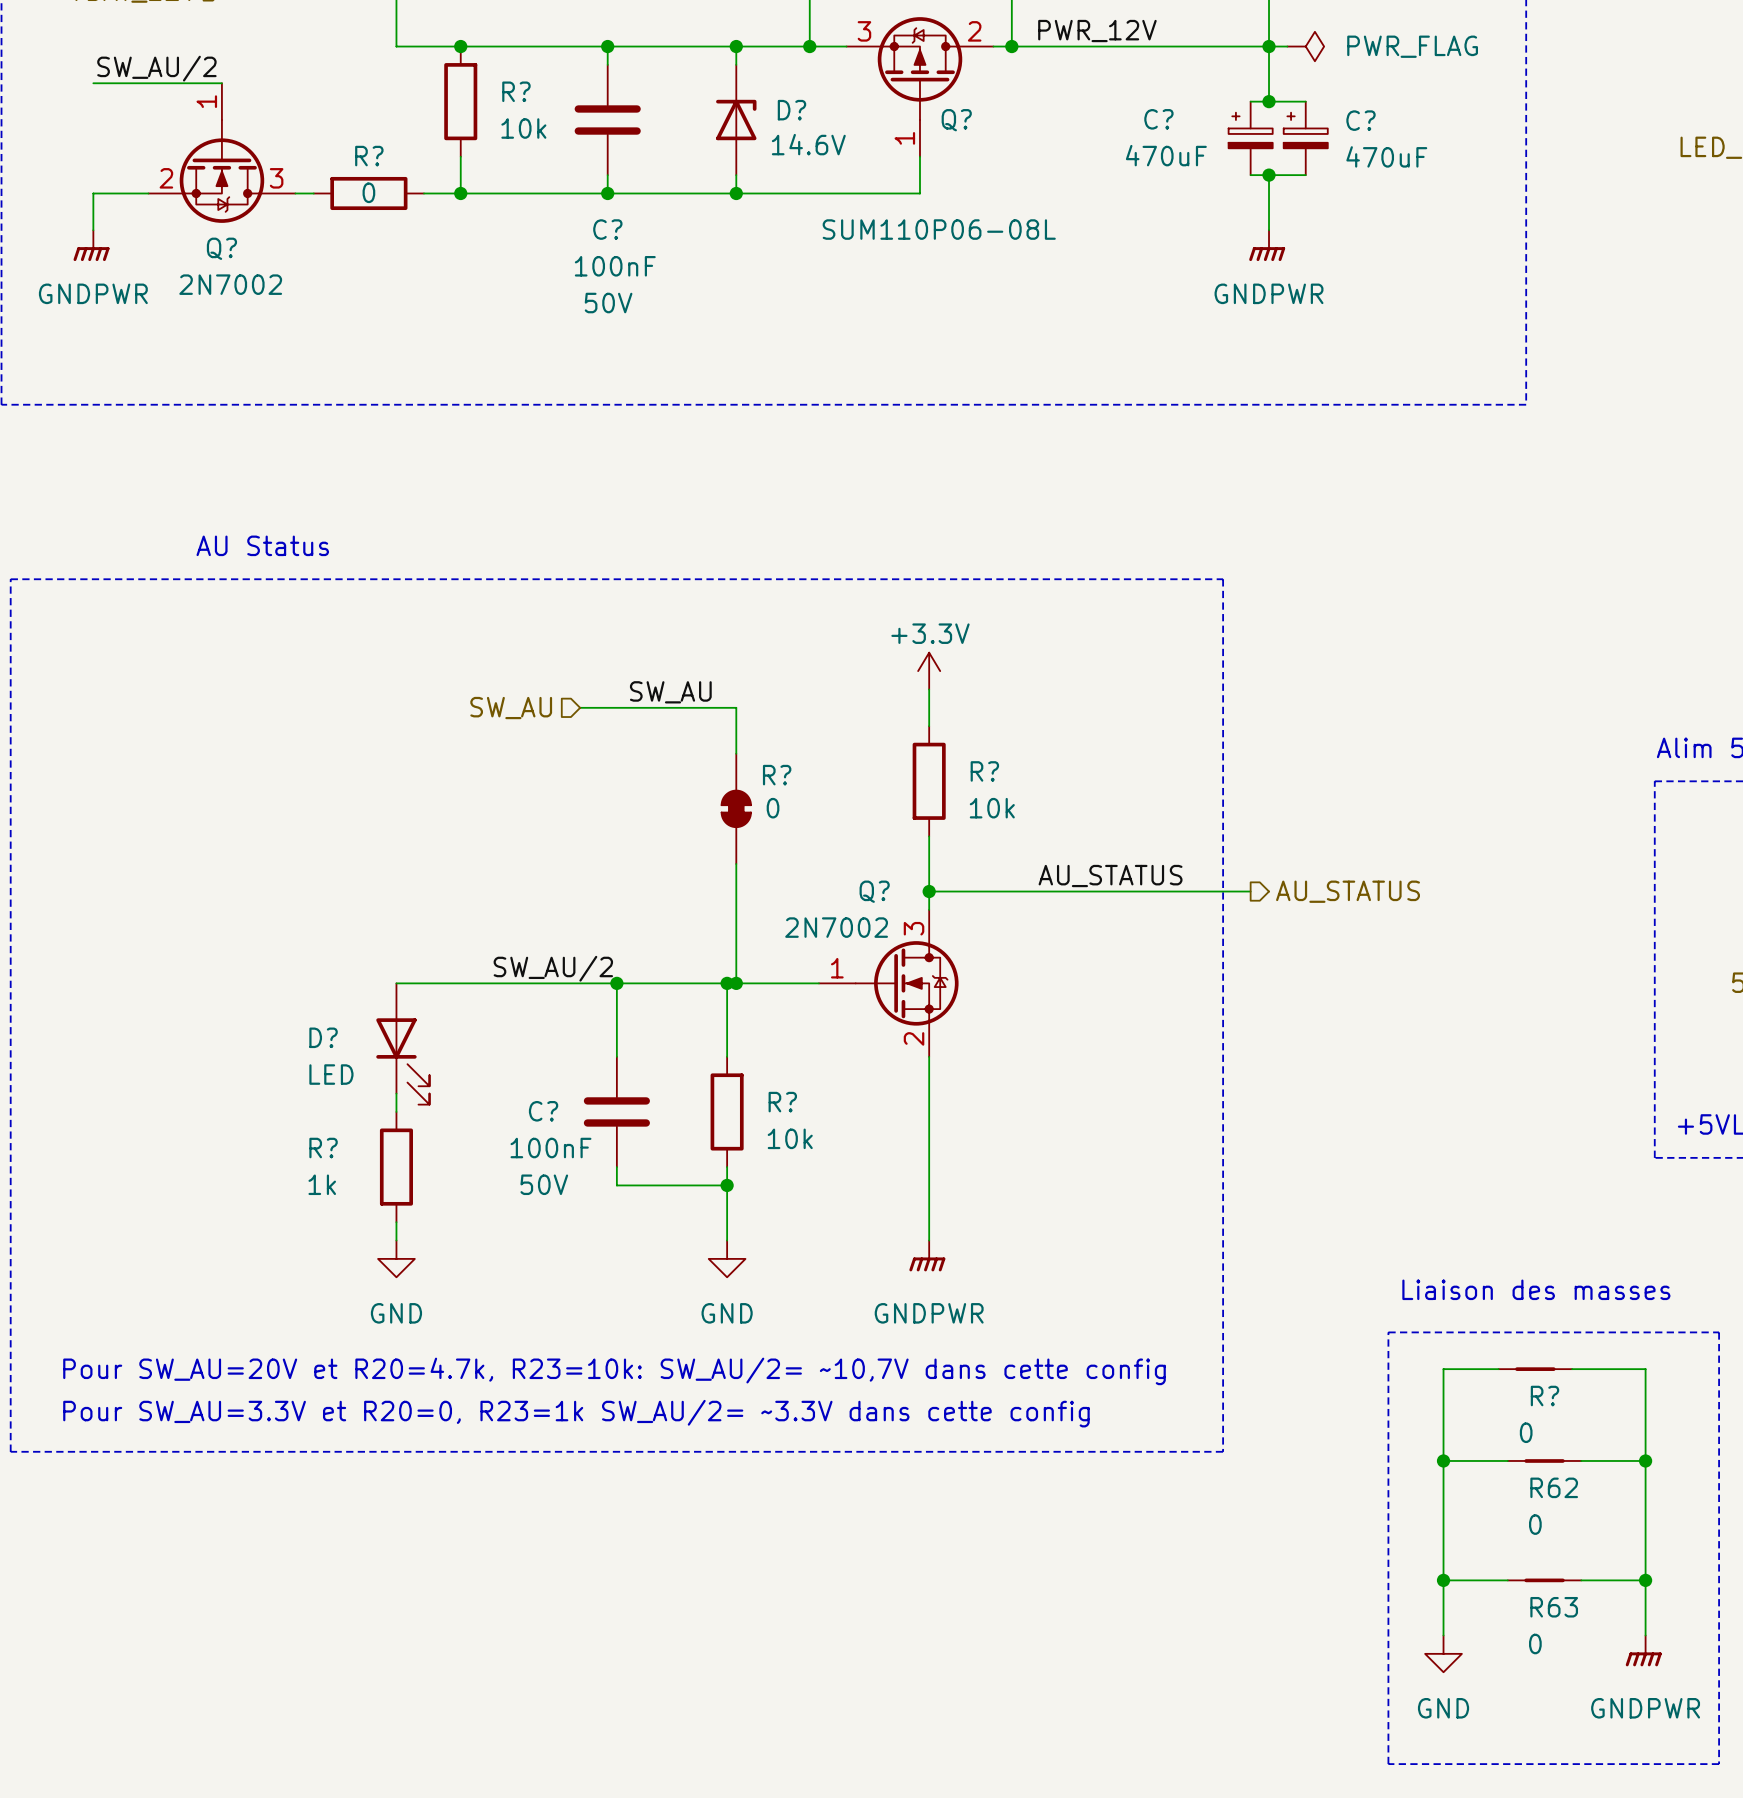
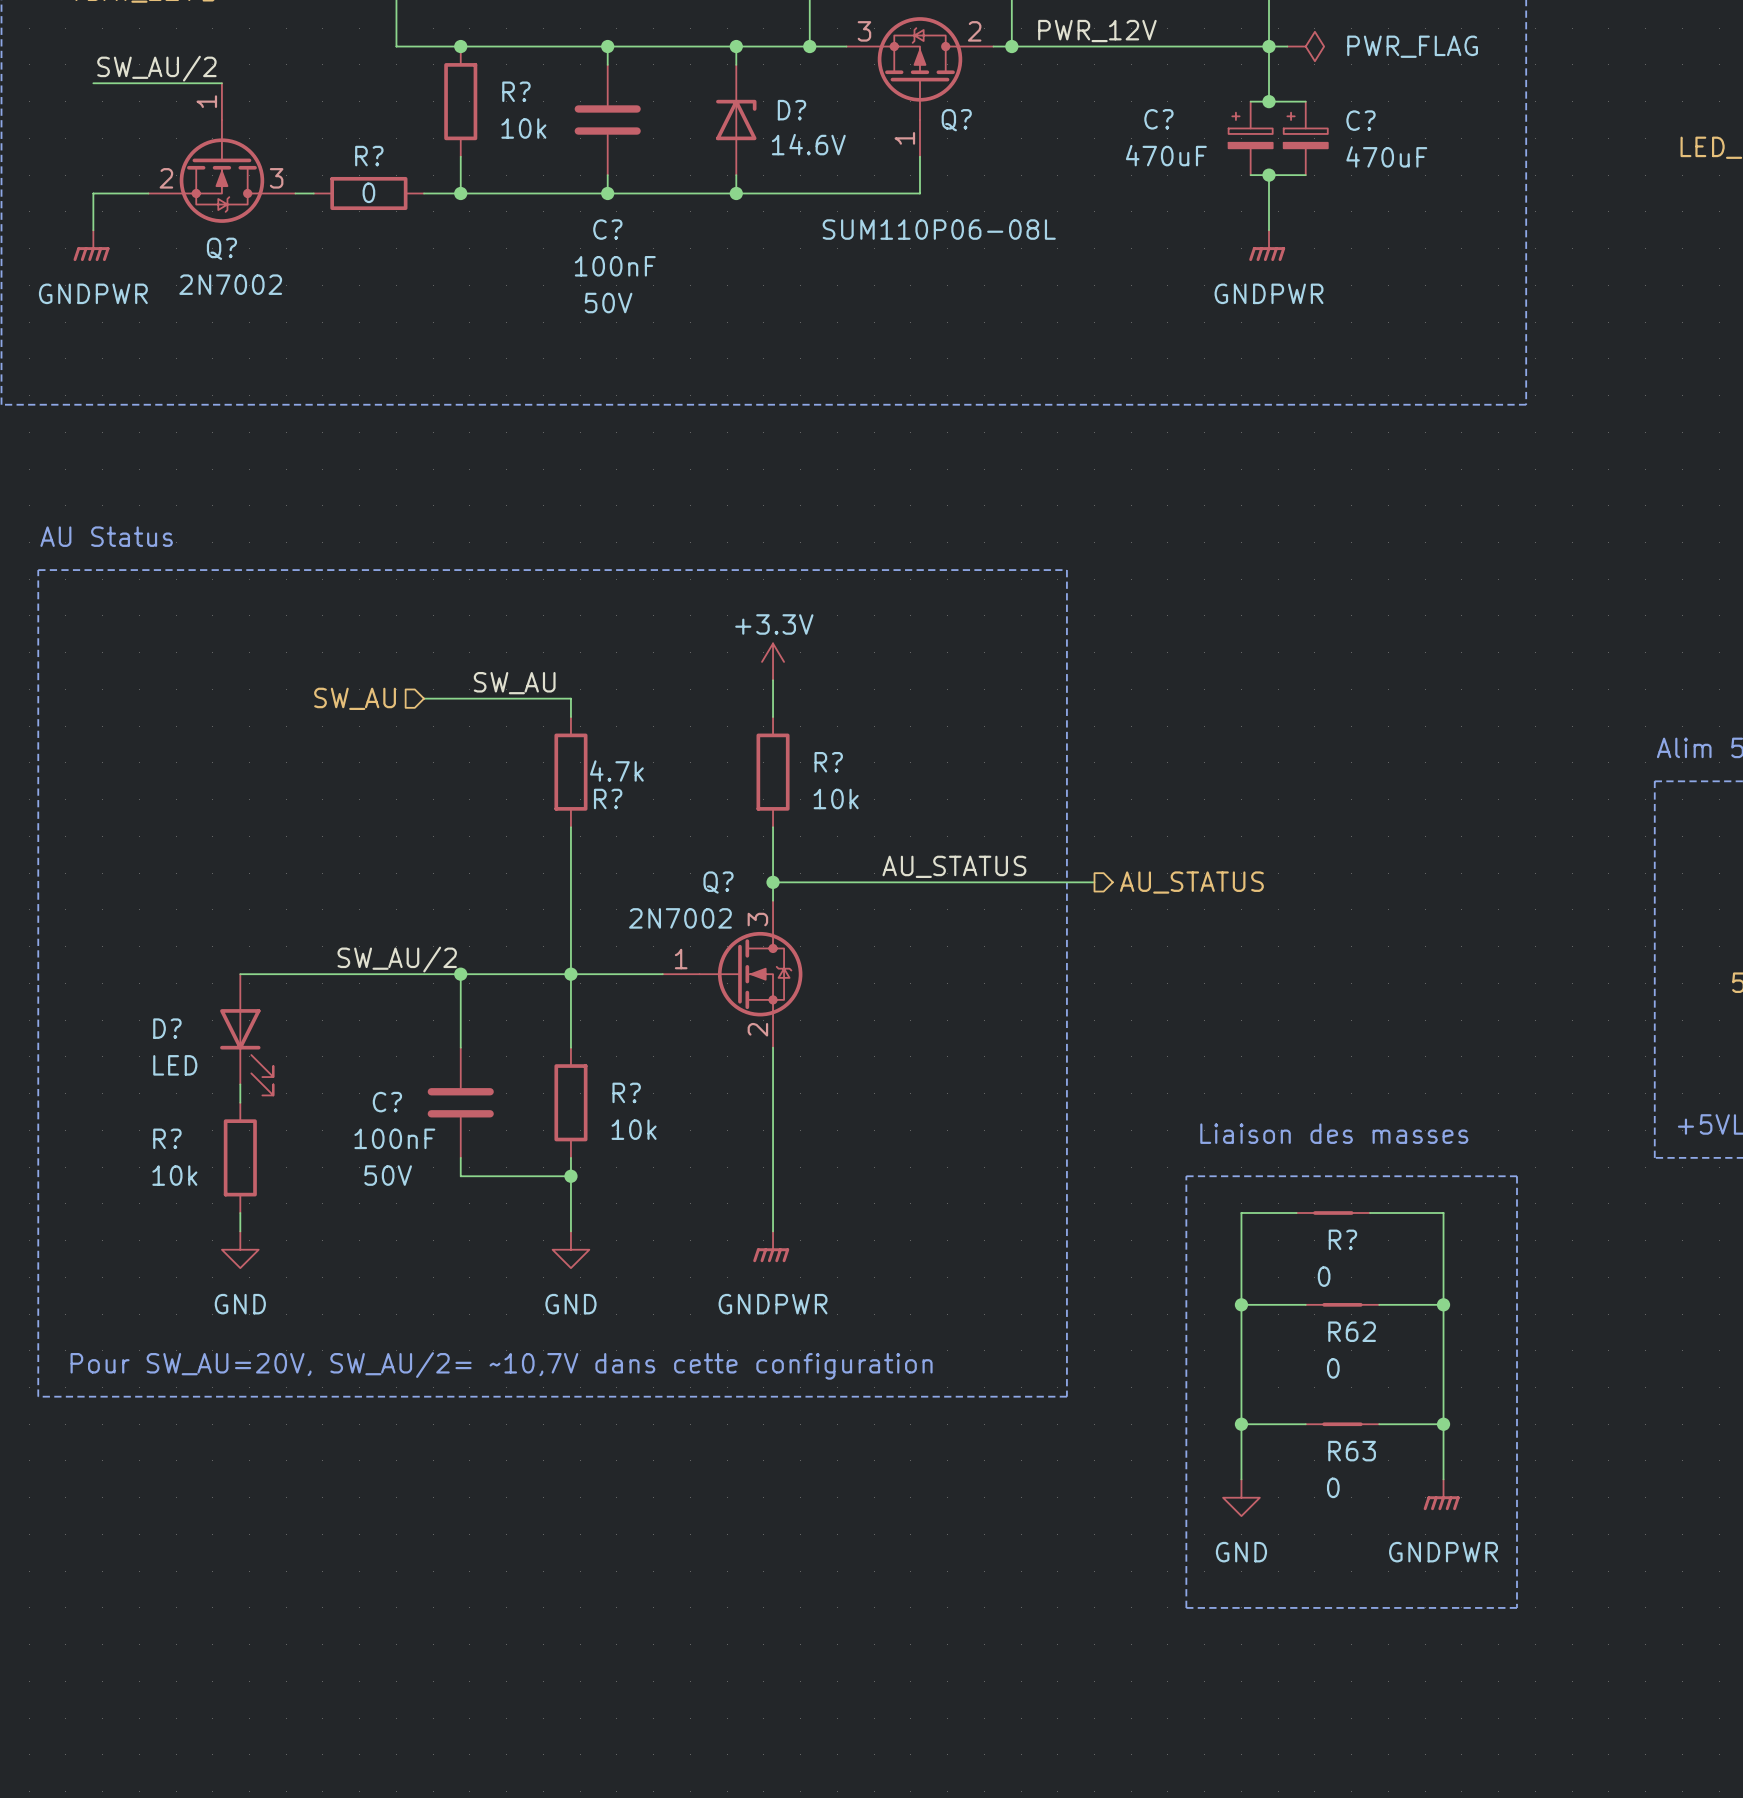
text position: AU Status (262, 545) -> AU Status (106, 536)
line: (10, 579) (1223, 579) (1223, 1451) (10, 1451) (10, 579) -> (38, 570) (38, 1396) (1066, 1396) (1066, 570) (38, 570)
power symbol position: +3.3V (929, 671) -> +3.3V (773, 661)
wire: (929, 689) (929, 726) -> (773, 680) (773, 717)
label position: SW_AU (670, 692) -> SW_AU (514, 683)
wire: none -> (424, 698) (570, 698) (570, 717)
wire: (580, 707) (736, 707) (736, 753) -> none
hierarchical label position: SW_AU (511, 708) -> SW_AU (355, 698)
R?: none -> 4.7k (570, 772)
R? position: (929, 781) -> (773, 772)
R?: 0 (736, 808) -> none
wire: none -> (570, 827) (570, 1047)
wire: (929, 836) (929, 909) -> (773, 827) (773, 900)
wire: (736, 863) (736, 983) -> none
label position: AU_STATUS (1110, 876) -> AU_STATUS (954, 866)
junction: none -> (773, 882)
wire: (929, 891) (1250, 891) -> (773, 882) (1094, 882)
junction: (929, 891) -> none
hierarchical label position: AU_STATUS (1348, 891) -> AU_STATUS (1191, 882)
label position: SW_AU/2 (553, 968) -> SW_AU/2 (397, 959)
junction: none -> (460, 974)
wire: (396, 983) (818, 983) -> (240, 974) (662, 974)
wire: (616, 983) (616, 1056) -> (460, 974) (460, 1047)
junction position: (616, 983) -> (570, 974)
wire: (727, 983) (727, 1056) -> none
junction: (727, 983) -> none
junction: (736, 983) -> none
Q? position: (888, 983) -> (732, 974)
D? position: (402, 1043) -> (246, 1034)
wire: (929, 1056) (929, 1240) -> (773, 1047) (773, 1231)
wire: (396, 1093) (396, 1111) -> (240, 1084) (240, 1102)
C? position: (616, 1111) -> (460, 1102)
R? position: (727, 1111) -> (570, 1102)
R?: none -> 10k (240, 1157)
R?: 1k (396, 1167) -> none
wire: (616, 1167) (616, 1185) (727, 1185) -> (460, 1157) (460, 1176) (570, 1176)
wire: (727, 1167) (727, 1240) -> (570, 1157) (570, 1231)
junction: none -> (570, 1176)
junction: (727, 1185) -> none
wire: none -> (1296, 1212) (1241, 1212) (1241, 1479)
wire: (396, 1222) (396, 1240) -> (240, 1212) (240, 1231)
power symbol: none -> GND (240, 1249)
power symbol: none -> GND (570, 1249)
power symbol position: GNDPWR (927, 1255) -> GNDPWR (771, 1246)
power symbol: GND (396, 1258) -> none
power symbol: GND (727, 1258) -> none
text position: Liaison des masses (1536, 1289) -> Liaison des masses (1334, 1133)
junction: none -> (1241, 1304)
junction: none -> (1443, 1304)
line: (1388, 1332) (1719, 1332) (1719, 1764) (1388, 1764) (1388, 1332) -> (1186, 1176) (1517, 1176) (1517, 1607) (1186, 1607) (1186, 1176)
wire: (1443, 1369) (1498, 1369) -> (1443, 1369) (1443, 1212) (1370, 1212)
R? position: (1535, 1369) -> (1333, 1212)
wire: (1572, 1369) (1645, 1369) (1645, 1635) -> none
text: Pour SW_AU=20V et R20=4.7k, R23=10k: SW_AU/2= ~10,7V dans cette config (614, 1371) -> Pour SW_AU=20V, SW_AU/2= ~10,7V dans cette configuration (501, 1365)
text: Pour SW_AU=3.3V et R20=0, R23=1k SW_AU/2= ~3.3V dans cette config (576, 1413) -> none
junction: none -> (1241, 1424)
wire: (1443, 1460) (1507, 1460) -> (1241, 1304) (1305, 1304)
junction position: (1443, 1460) -> (1443, 1424)
R62 position: (1544, 1460) -> (1342, 1304)
wire: (1581, 1460) (1645, 1460) -> (1379, 1304) (1443, 1304)
junction: (1645, 1460) -> none
wire: (1443, 1479) (1443, 1635) -> none
wire: (1443, 1580) (1507, 1580) -> (1241, 1424) (1305, 1424)
junction: (1443, 1580) -> none
R63 position: (1544, 1580) -> (1342, 1424)
wire: (1581, 1580) (1645, 1580) -> (1379, 1424) (1443, 1424)
junction: (1645, 1580) -> none
power symbol position: GNDPWR (1643, 1650) -> GNDPWR (1441, 1494)
power symbol position: GND (1443, 1653) -> GND (1241, 1497)

